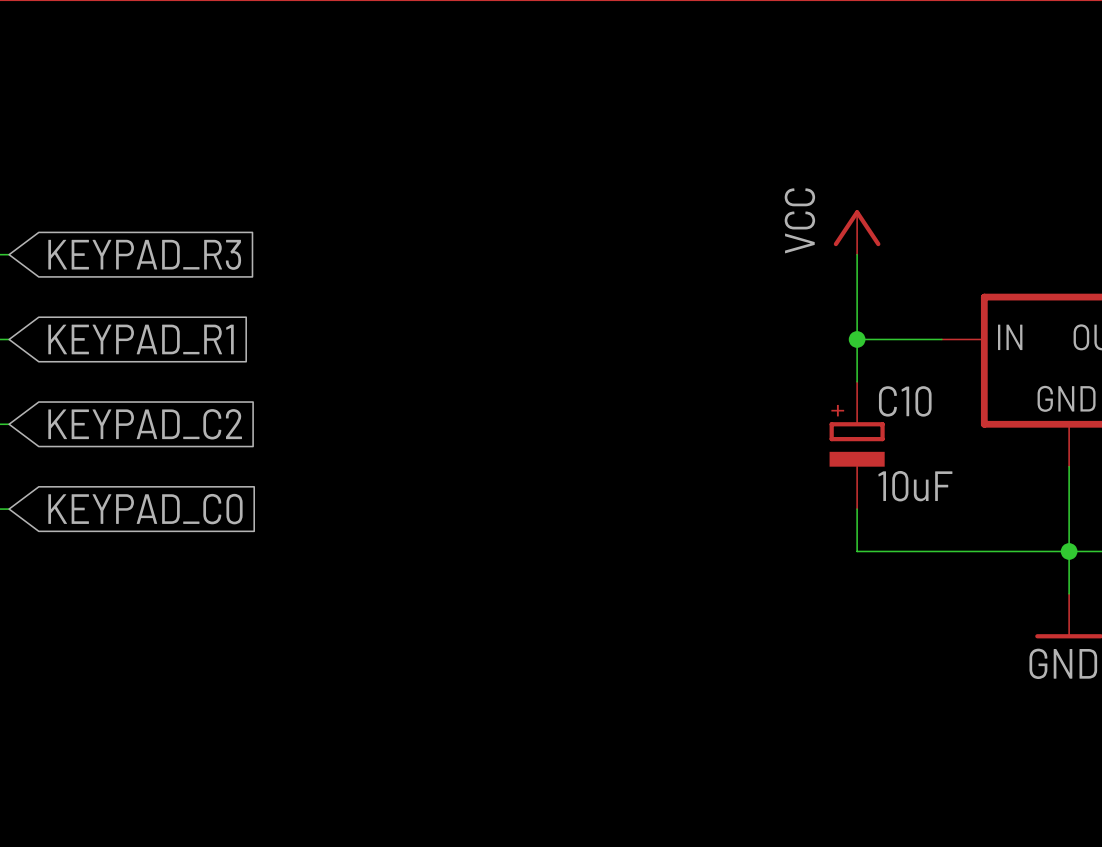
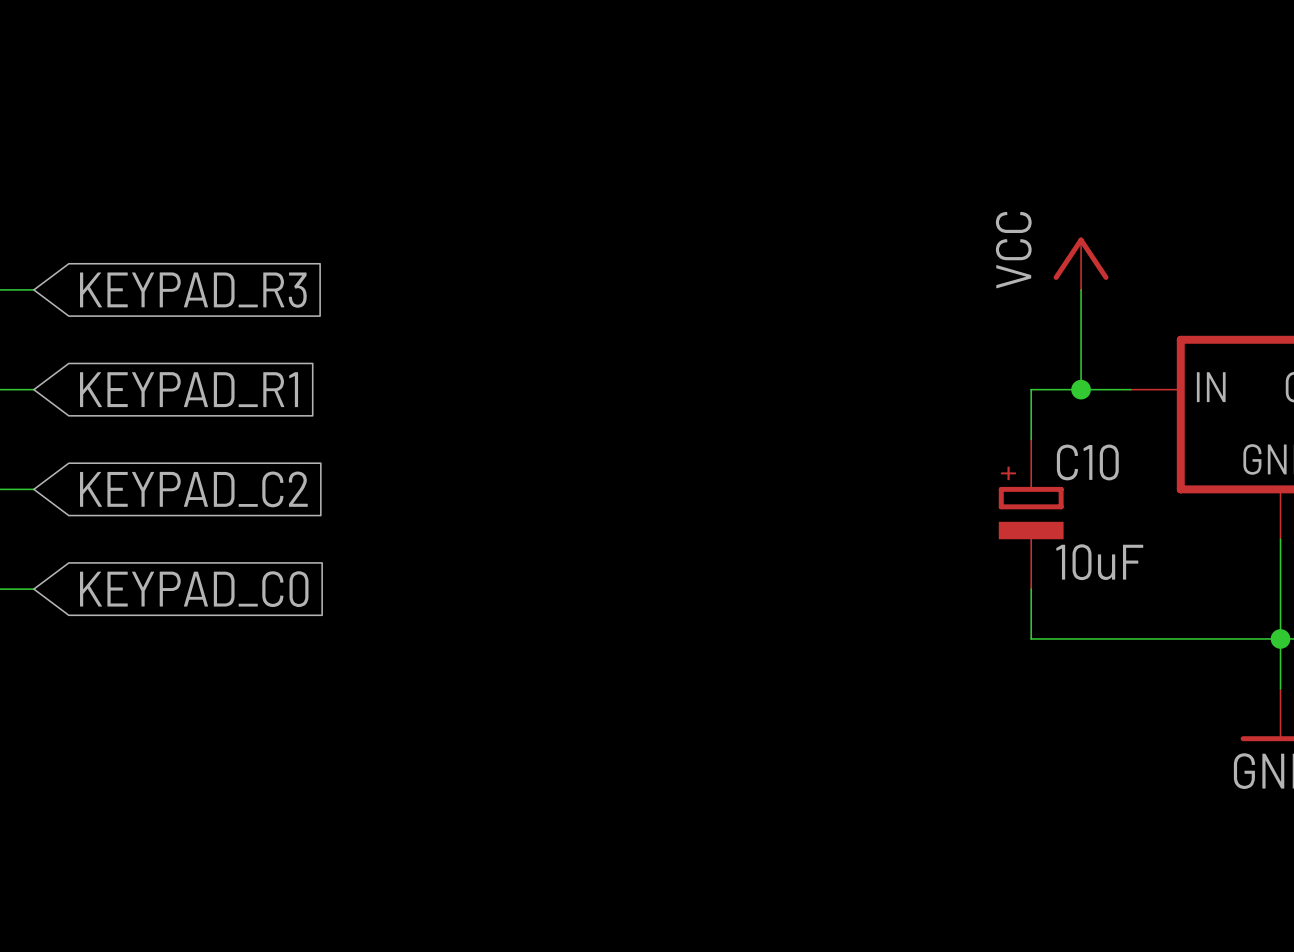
power symbol position: VCC (857, 232) -> VCC (1081, 263)
wire: (857, 254) (857, 339) -> (1081, 289) (1081, 389)
junction position: (857, 339) -> (1081, 389)

